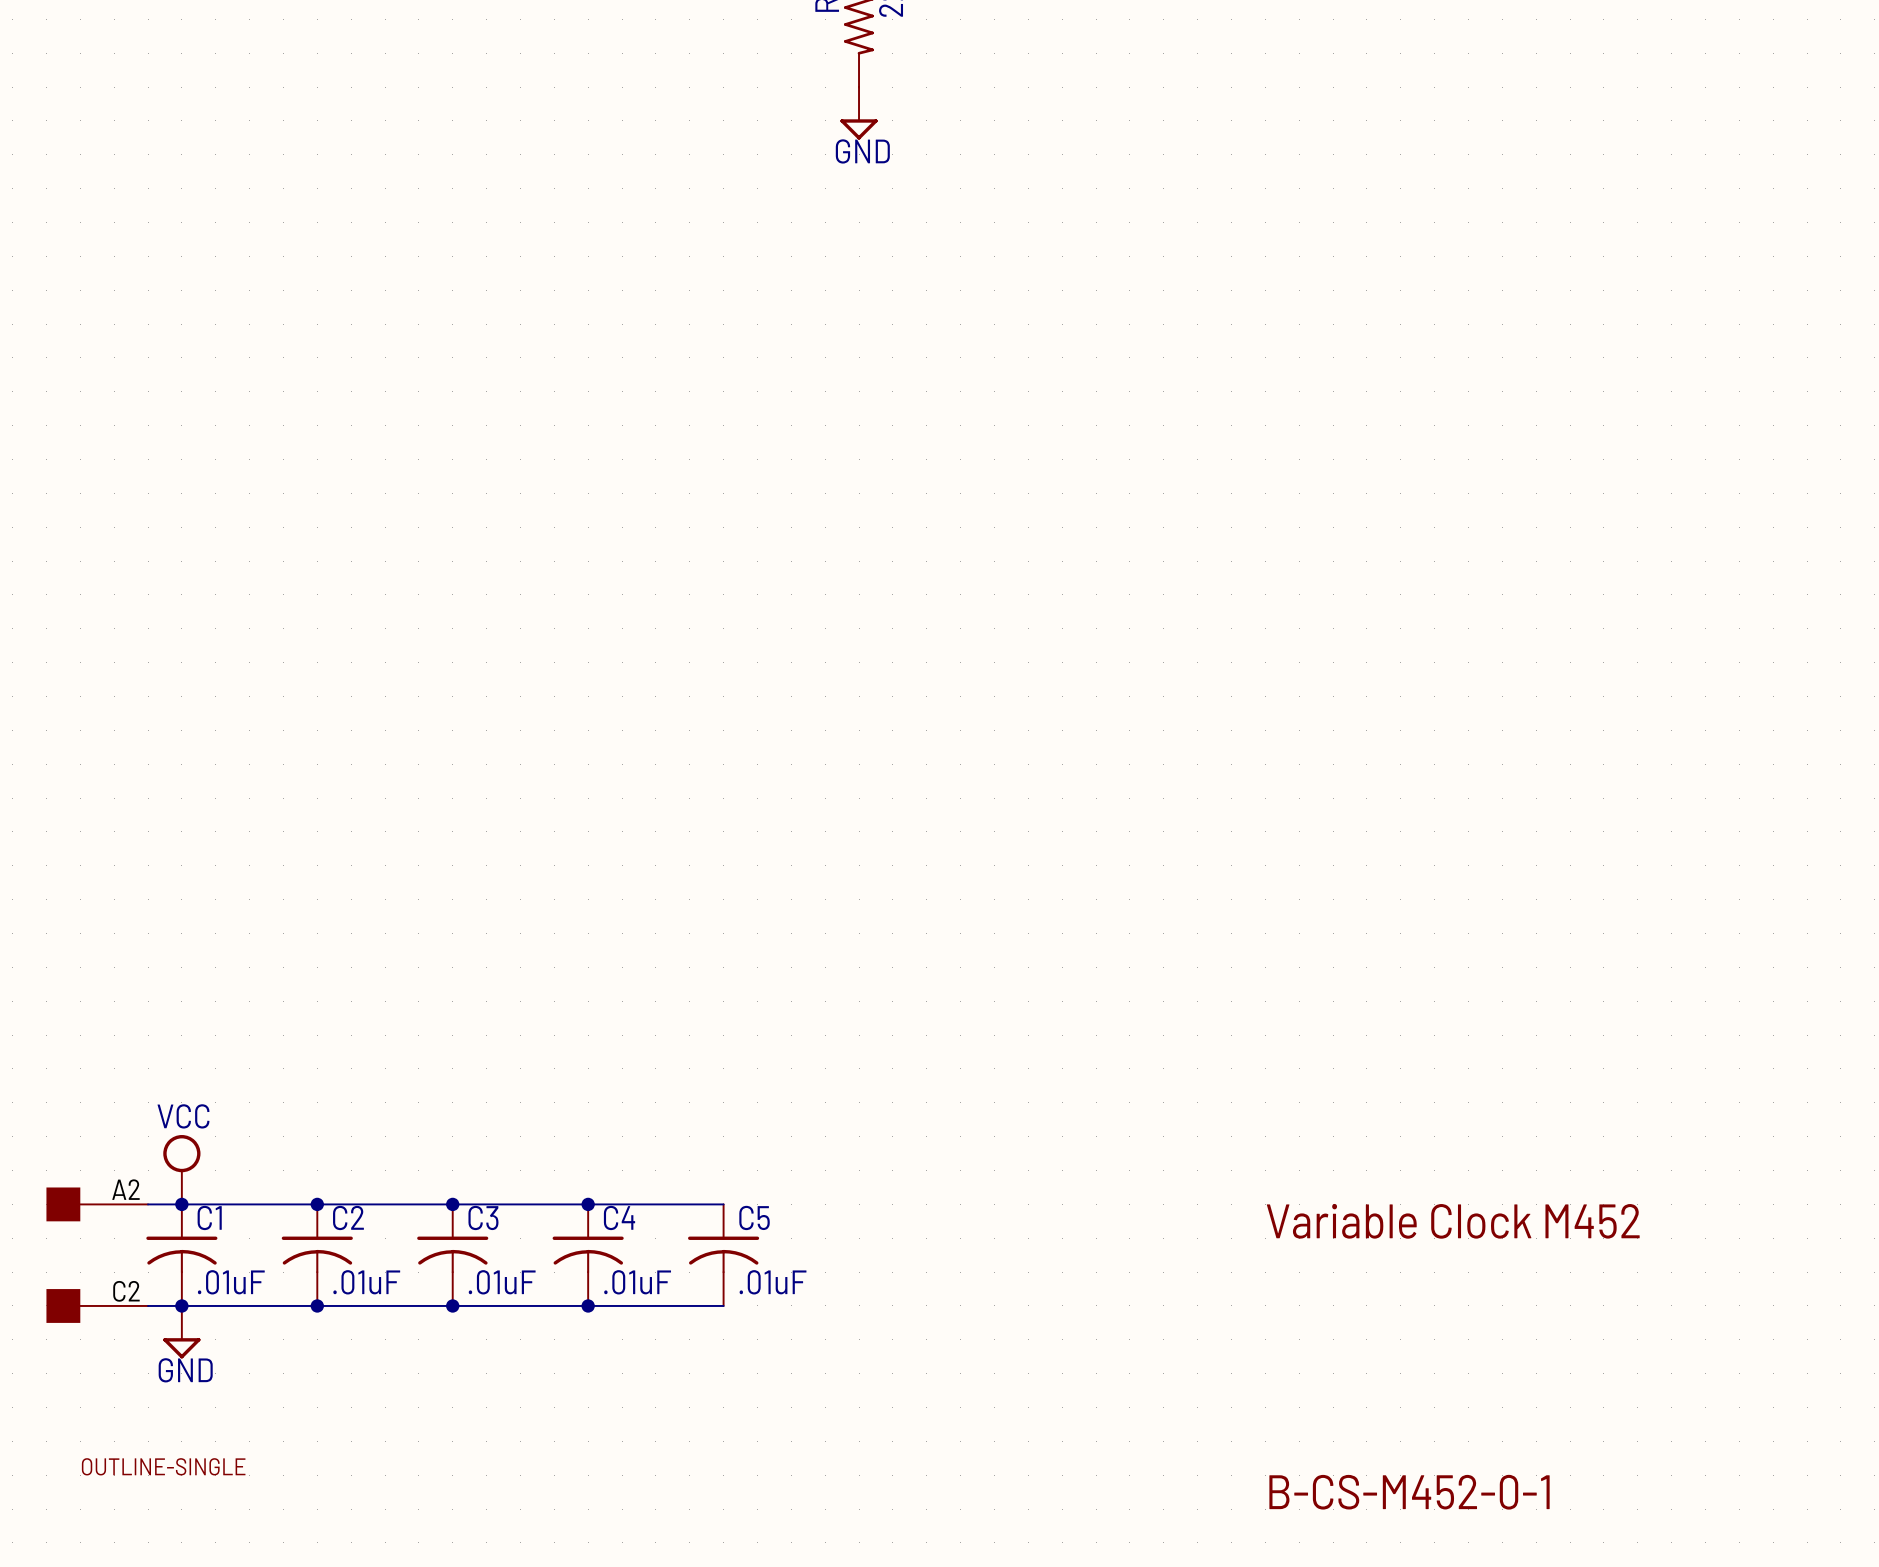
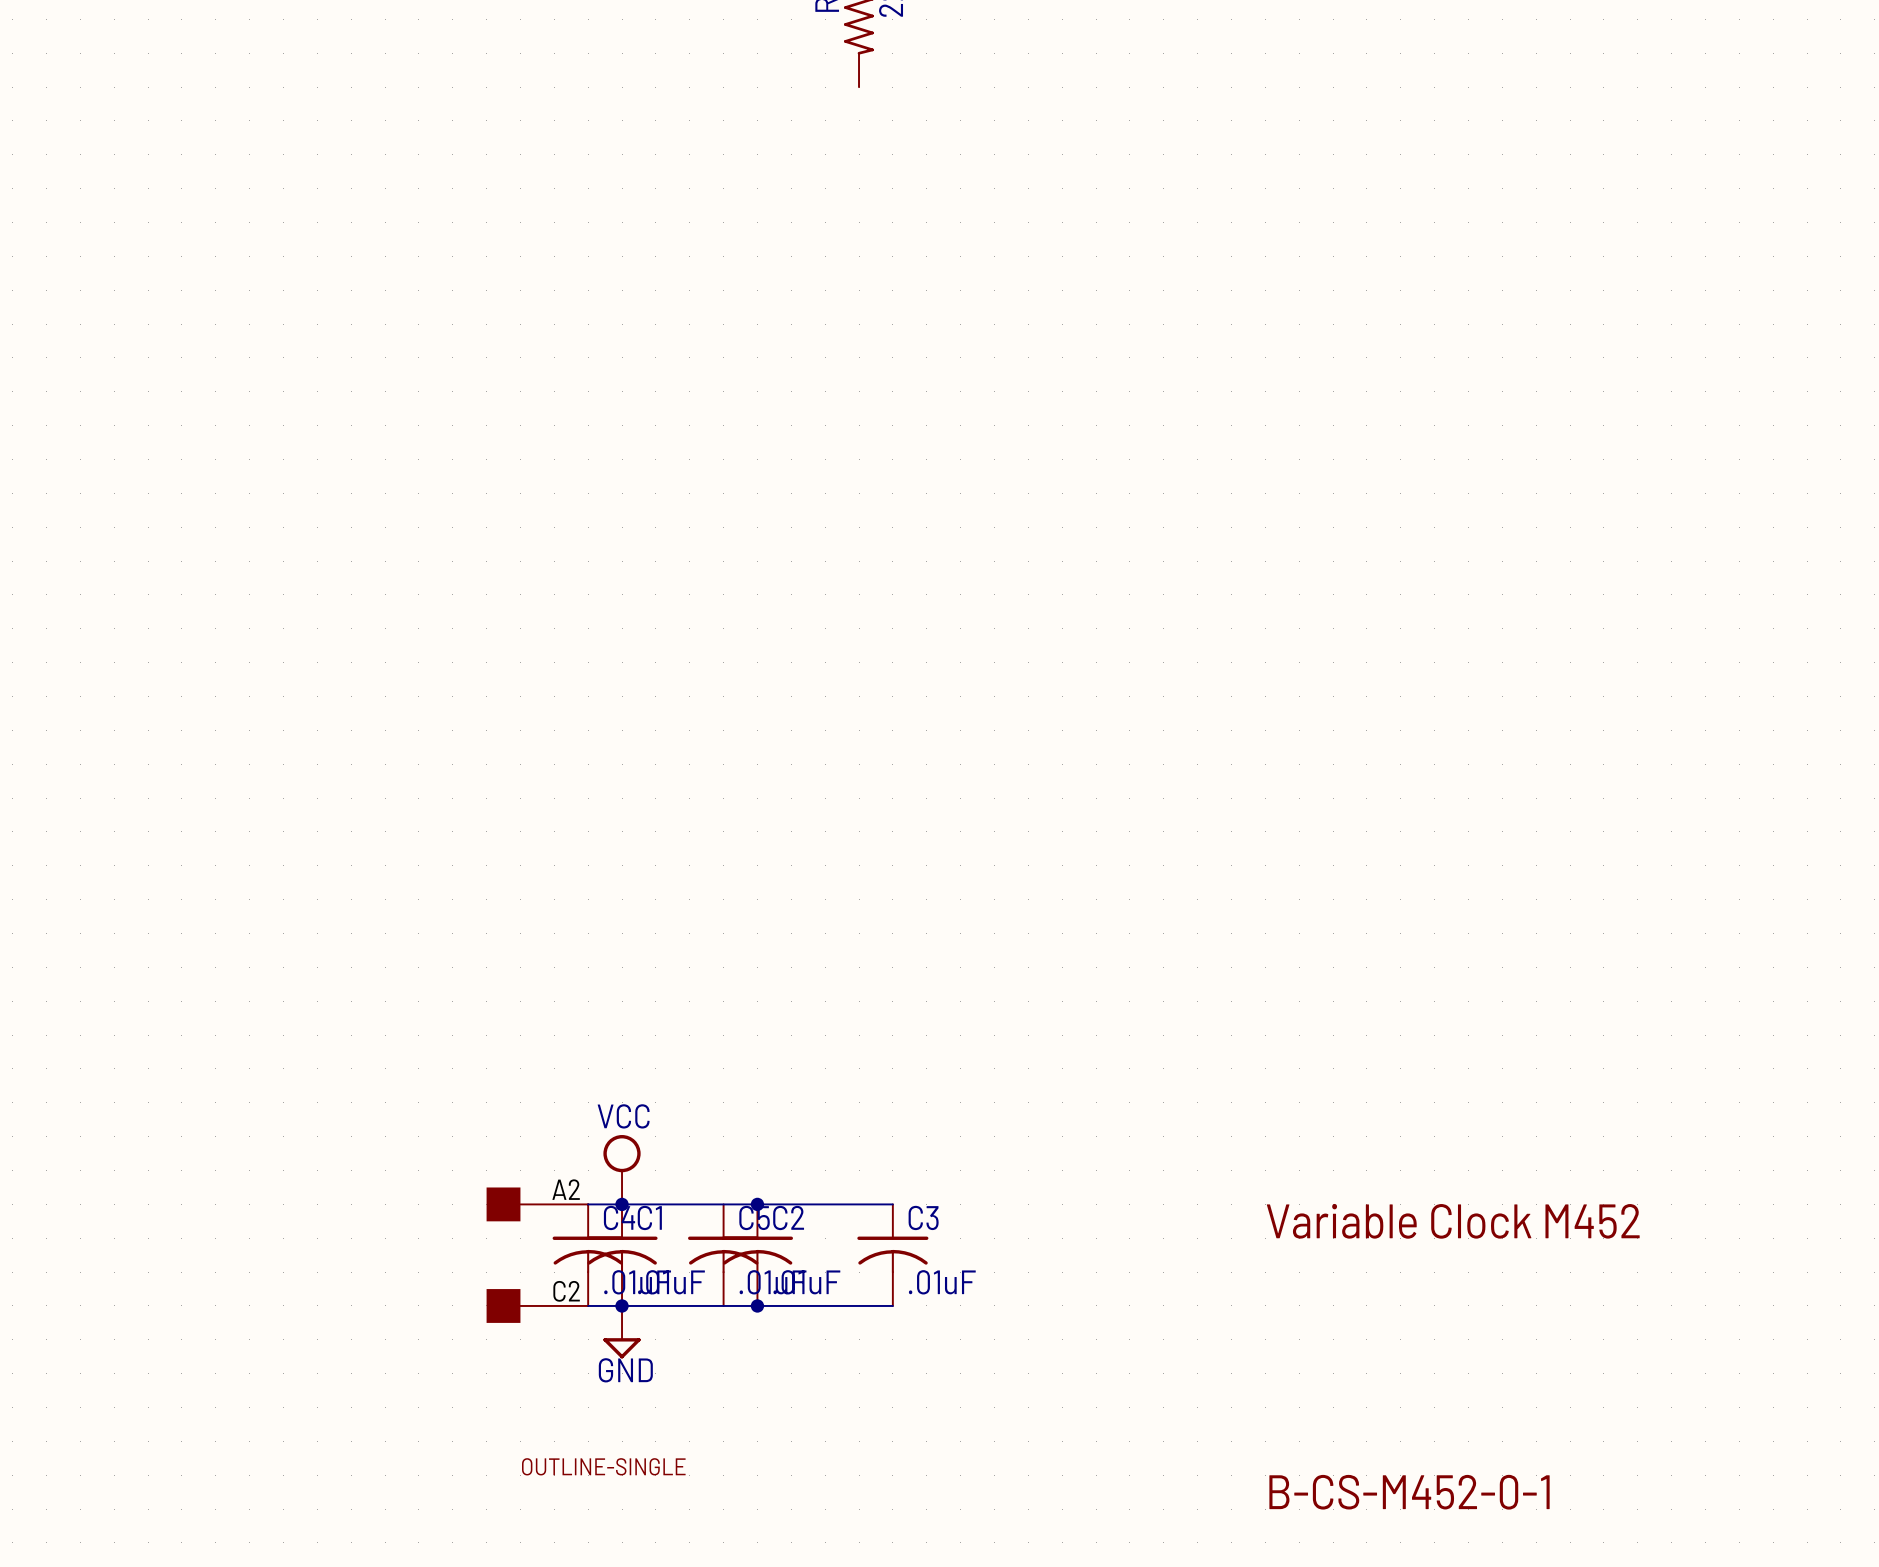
power symbol: GND (859, 113) -> none
power symbol: VCC (181, 1169) -> none
power symbol: none -> VCC (622, 1169)
part: (97, 1204) -> none
wire: (148, 1204) (588, 1204) -> none
junction: (181, 1204) -> none
junction: (317, 1204) -> none
junction: (452, 1204) -> none
part: none -> (537, 1204)
junction position: (588, 1204) -> (622, 1204)
wire: none -> (723, 1204) (892, 1204)
junction: none -> (757, 1204)
C1 position: (181, 1255) -> (622, 1255)
C2 position: (317, 1255) -> (757, 1255)
C3 position: (452, 1255) -> (892, 1255)
part: (97, 1305) -> none
wire: (148, 1305) (588, 1305) -> none
junction: (181, 1305) -> none
junction: (317, 1305) -> none
junction: (452, 1305) -> none
part: none -> (537, 1305)
junction position: (588, 1305) -> (622, 1305)
wire: none -> (723, 1305) (892, 1305)
junction: none -> (757, 1305)
power symbol: GND (181, 1332) -> none
power symbol: none -> GND (622, 1332)
part: OUTLINE-SINGLE (163, 1466) -> none
part: none -> OUTLINE-SINGLE (603, 1466)

